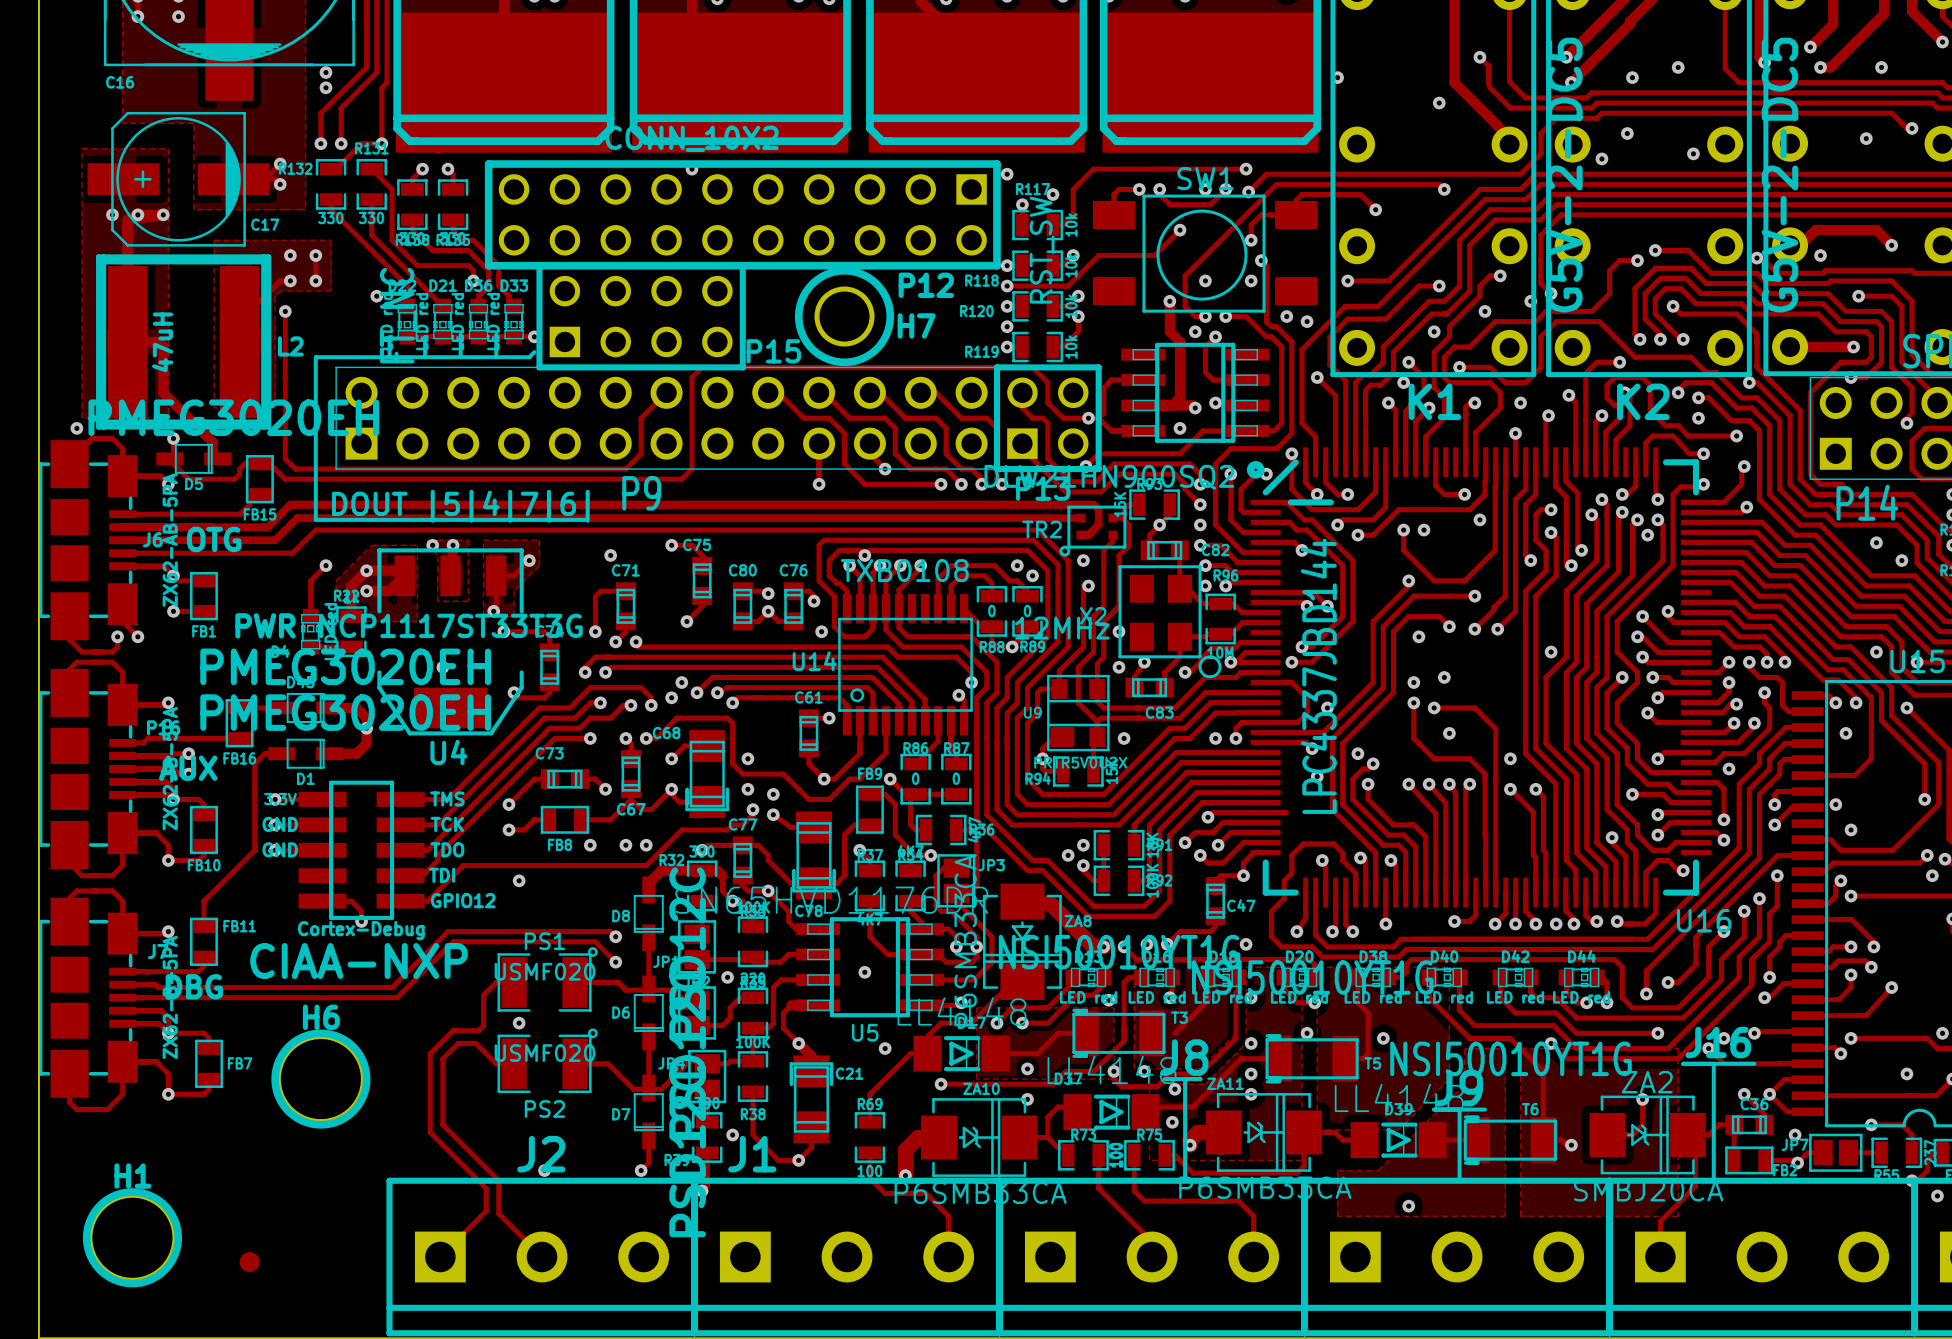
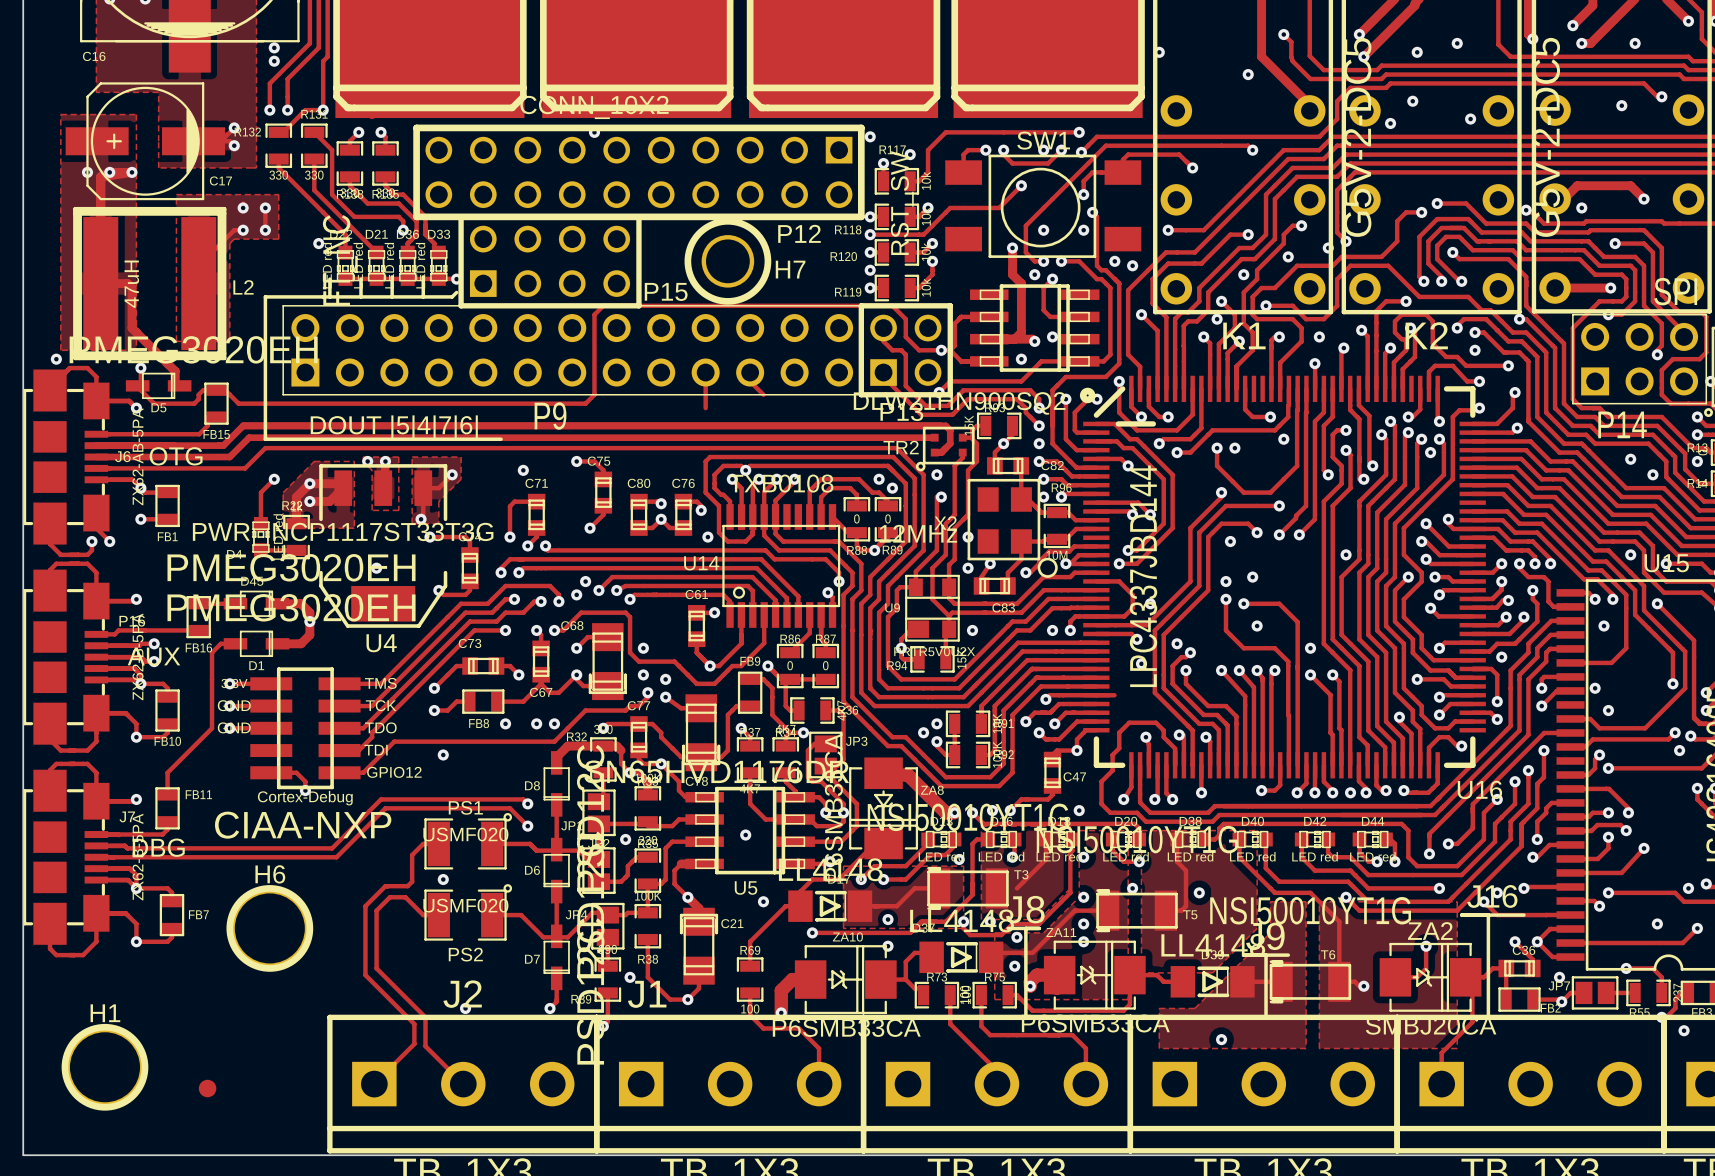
track: (285, 311) (285, 458) (295, 469) (625, 469) (641, 453) (641, 418) (666, 392) -> none
via: (285, 311) -> none
track: (768, 392) (778, 392) (803, 418) (829, 418) (844, 433) (844, 463) (864, 484) (941, 484) -> none
track: (819, 392) (824, 392) (849, 418) (885, 418) (895, 428) (895, 453) (910, 469) (946, 469) (961, 484) -> none
track: (869, 392) (880, 392) (905, 418) (935, 418) (946, 428) (946, 453) (961, 469) (971, 469) (981, 479) (981, 484) -> none
track: (920, 392) (935, 392) (961, 418) (986, 418) (997, 428) (997, 479) (1002, 484) -> none
via: (885, 469) -> none
via: (819, 484) -> none
via: (941, 484) -> none
via: (961, 484) -> none
via: (981, 484) -> none
via: (1002, 484) -> none

